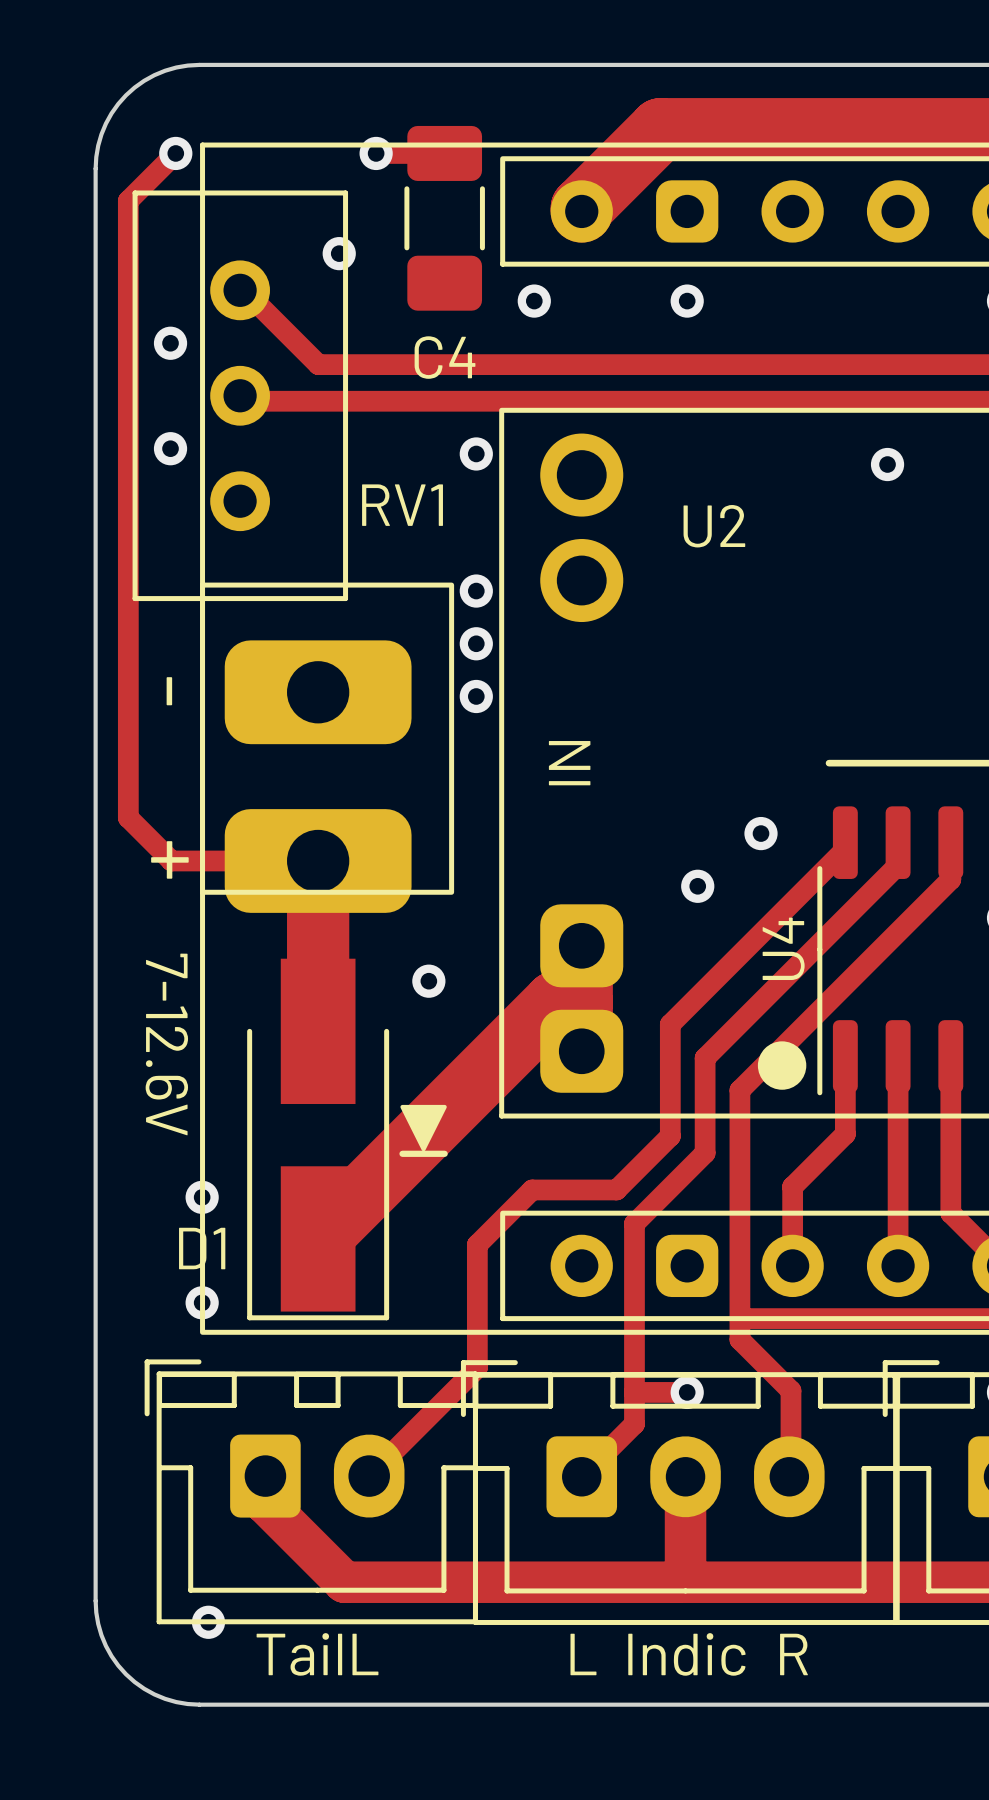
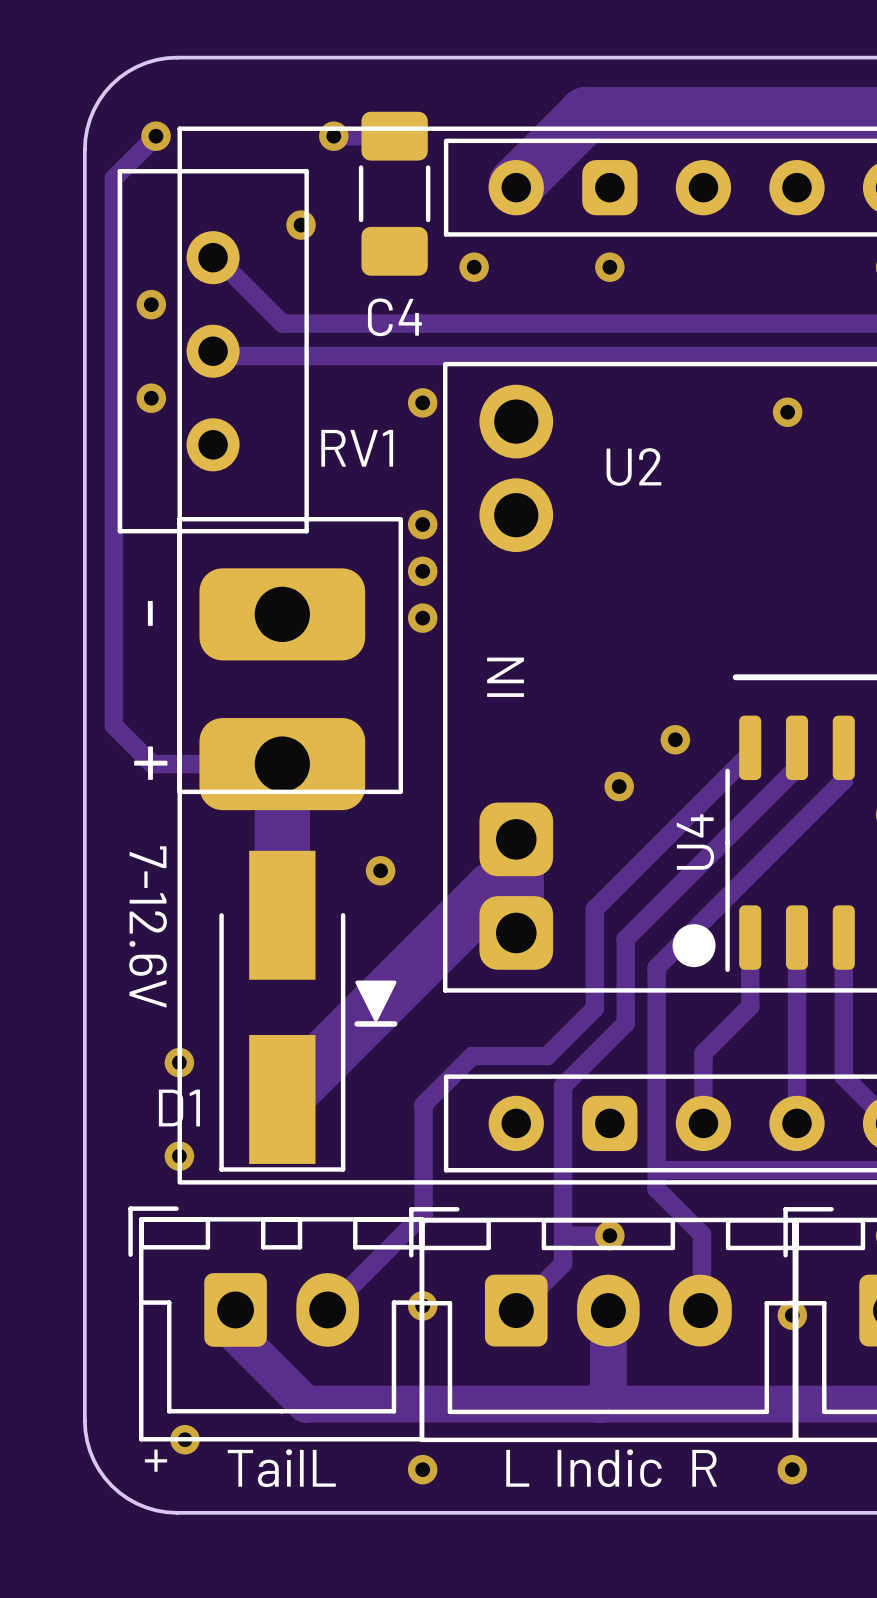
via: none -> (422, 1305)
via: none -> (792, 1315)
text: none -> + (156, 1460)
via: none -> (422, 1469)
via: none -> (792, 1469)

